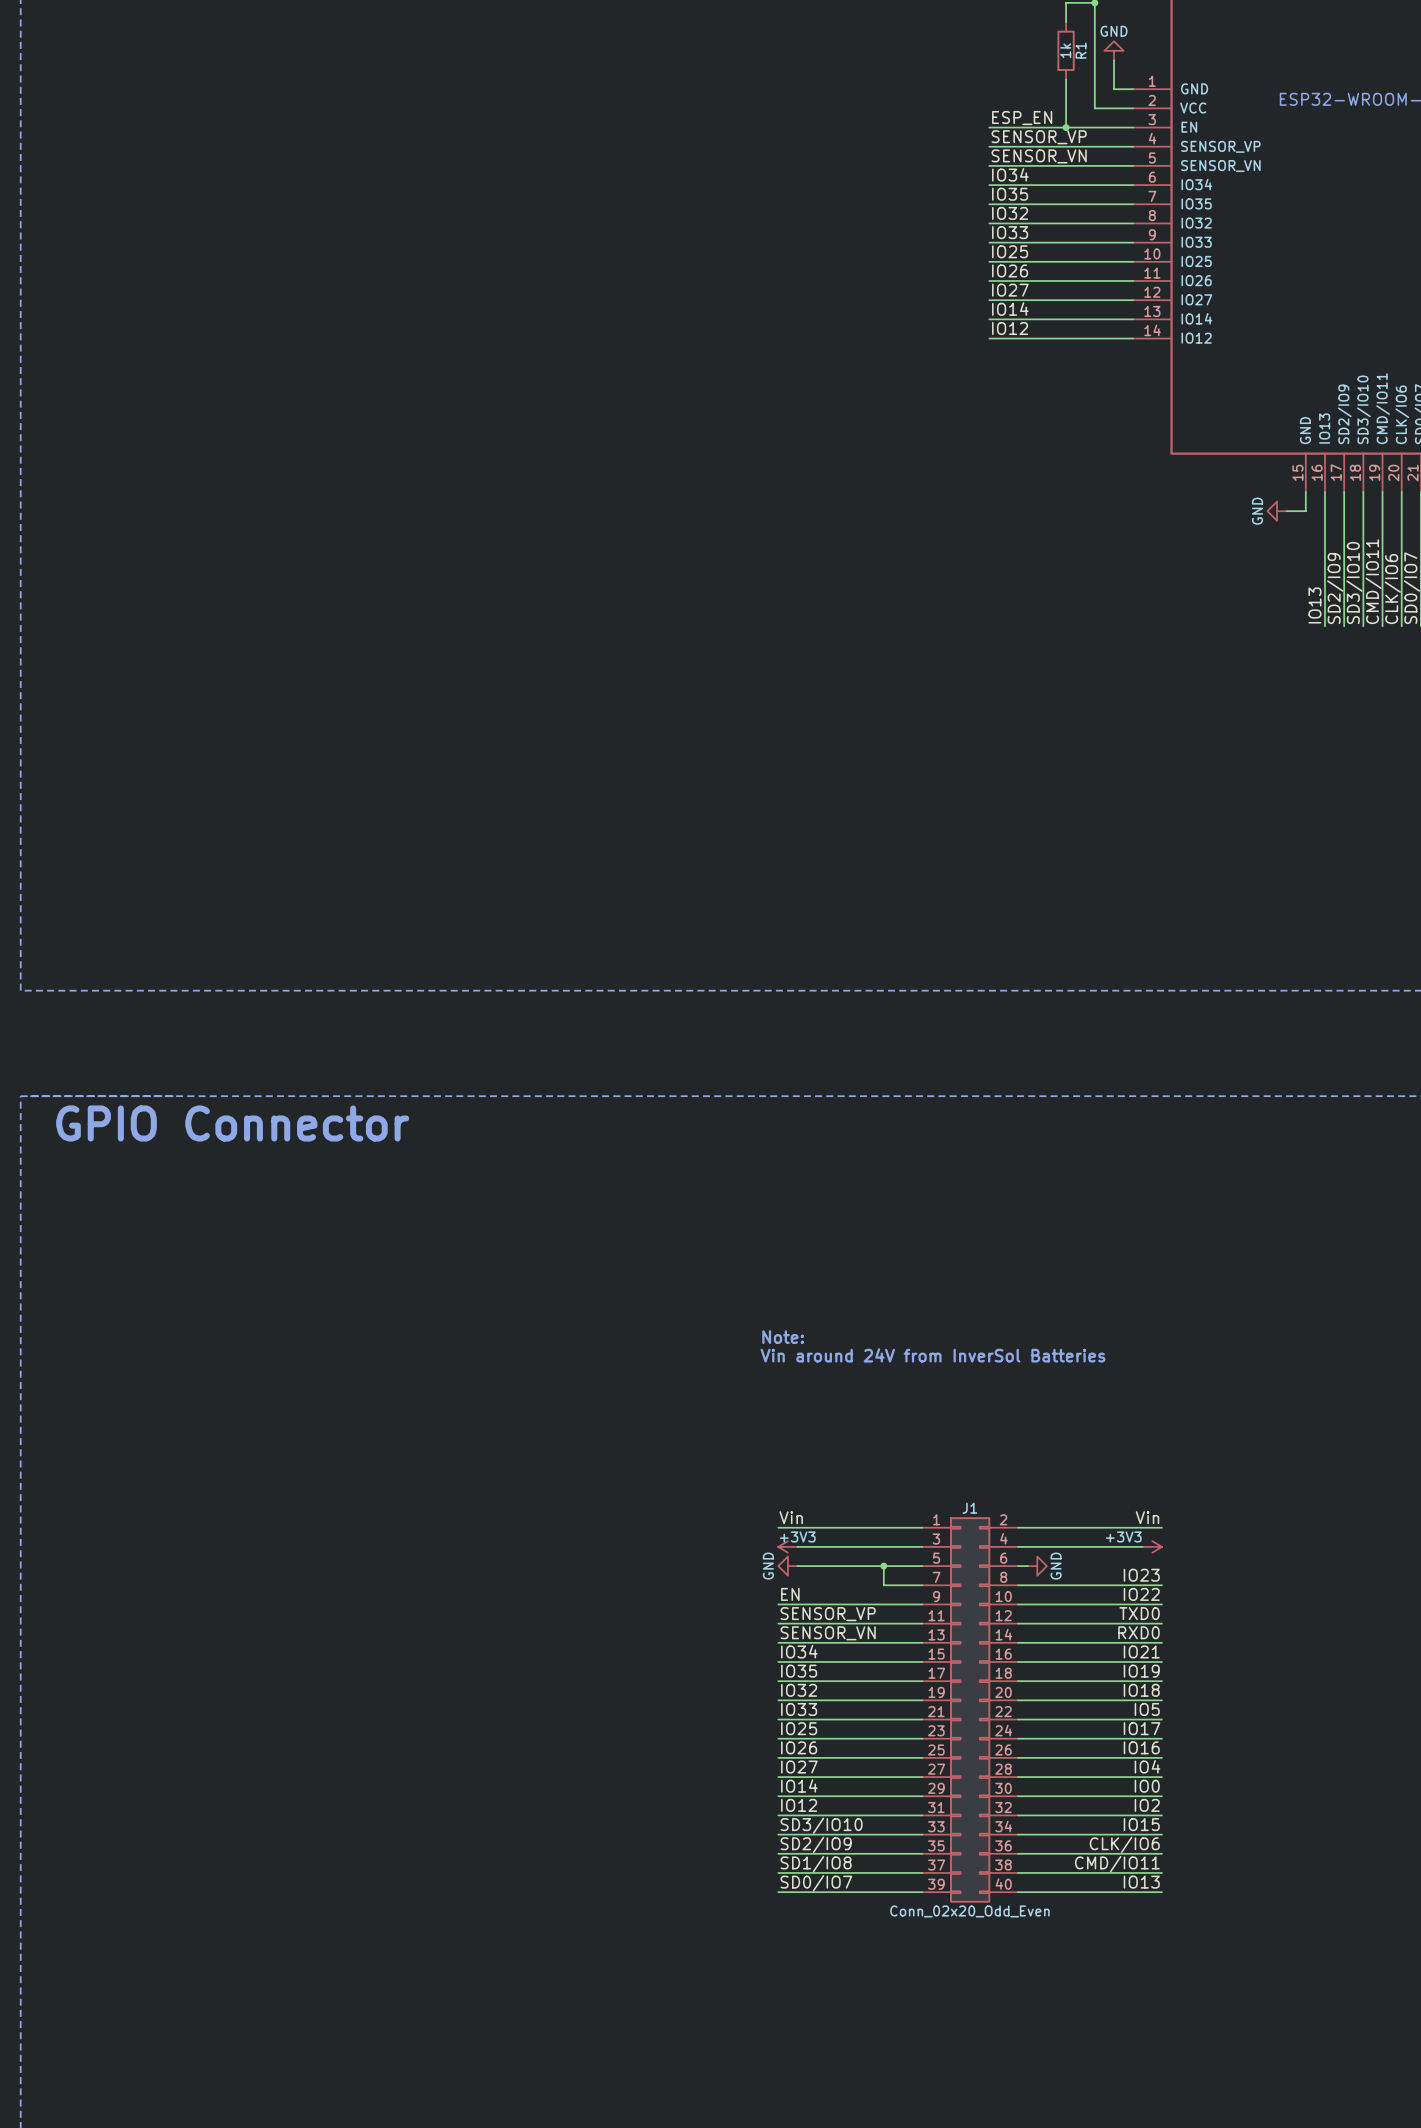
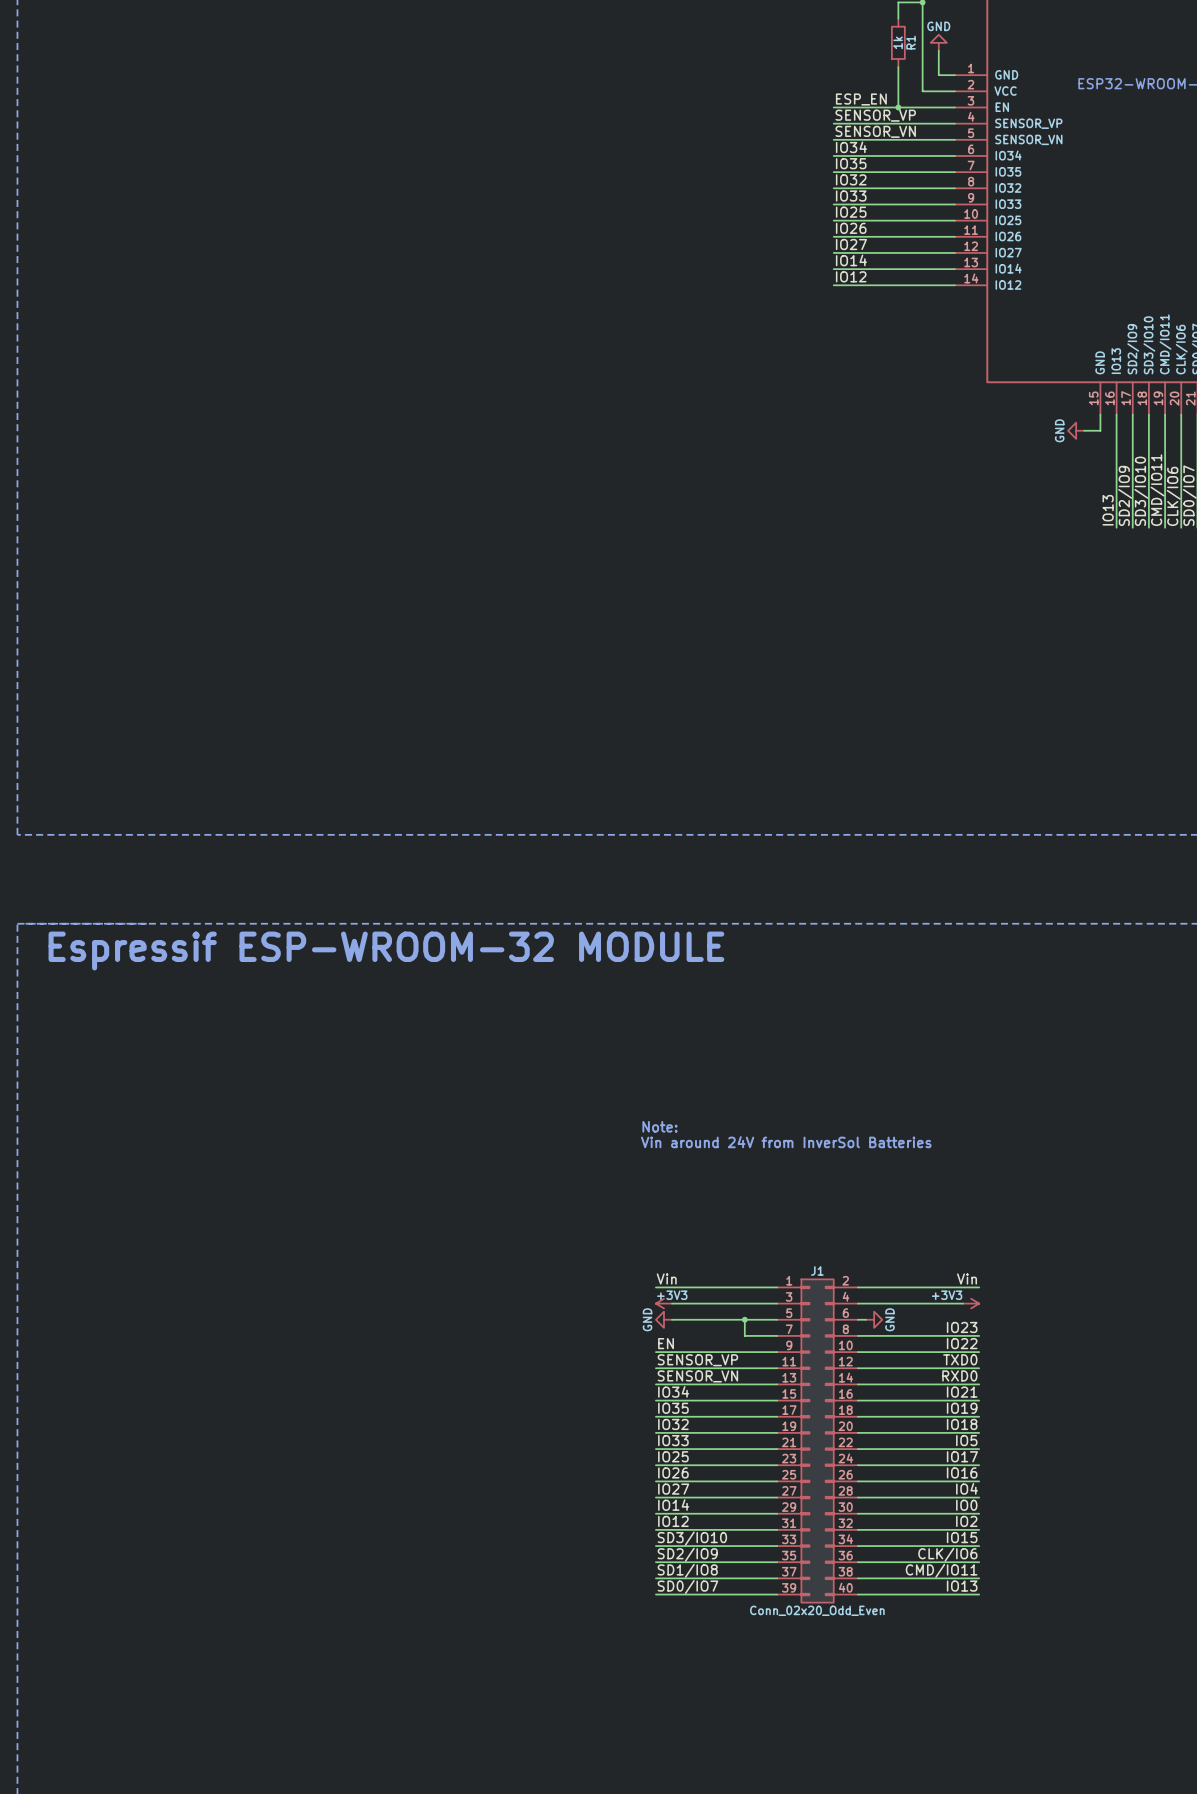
text: GPIO Connector (232, 1123) -> Espressif ESP-WROOM-32 MODULE (386, 951)

